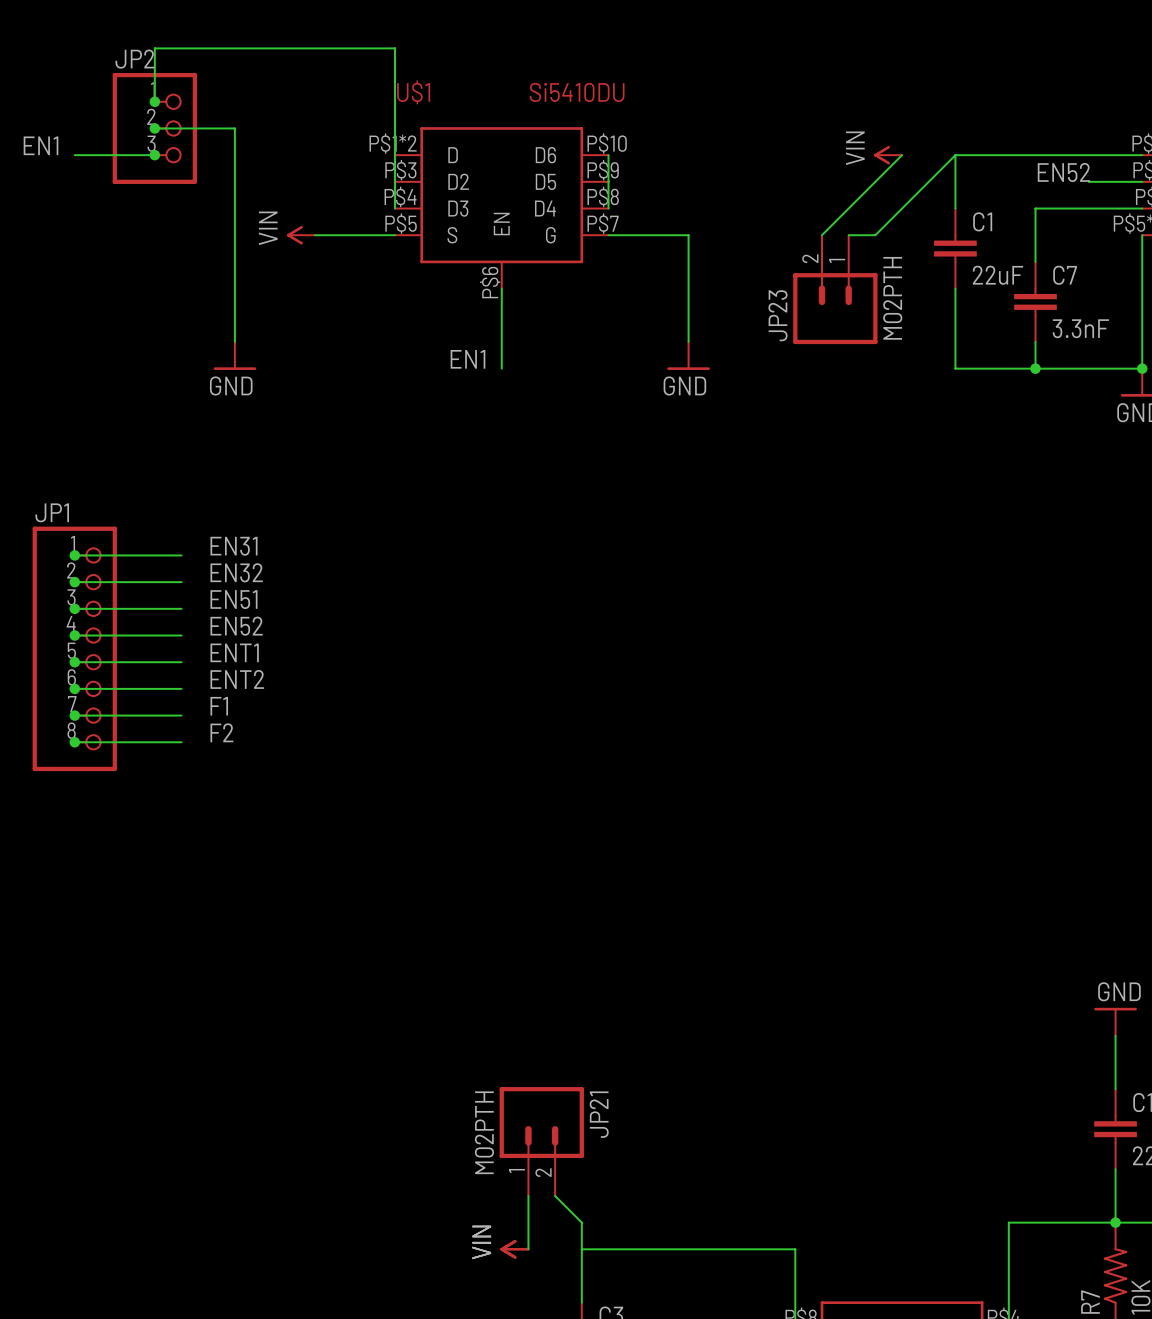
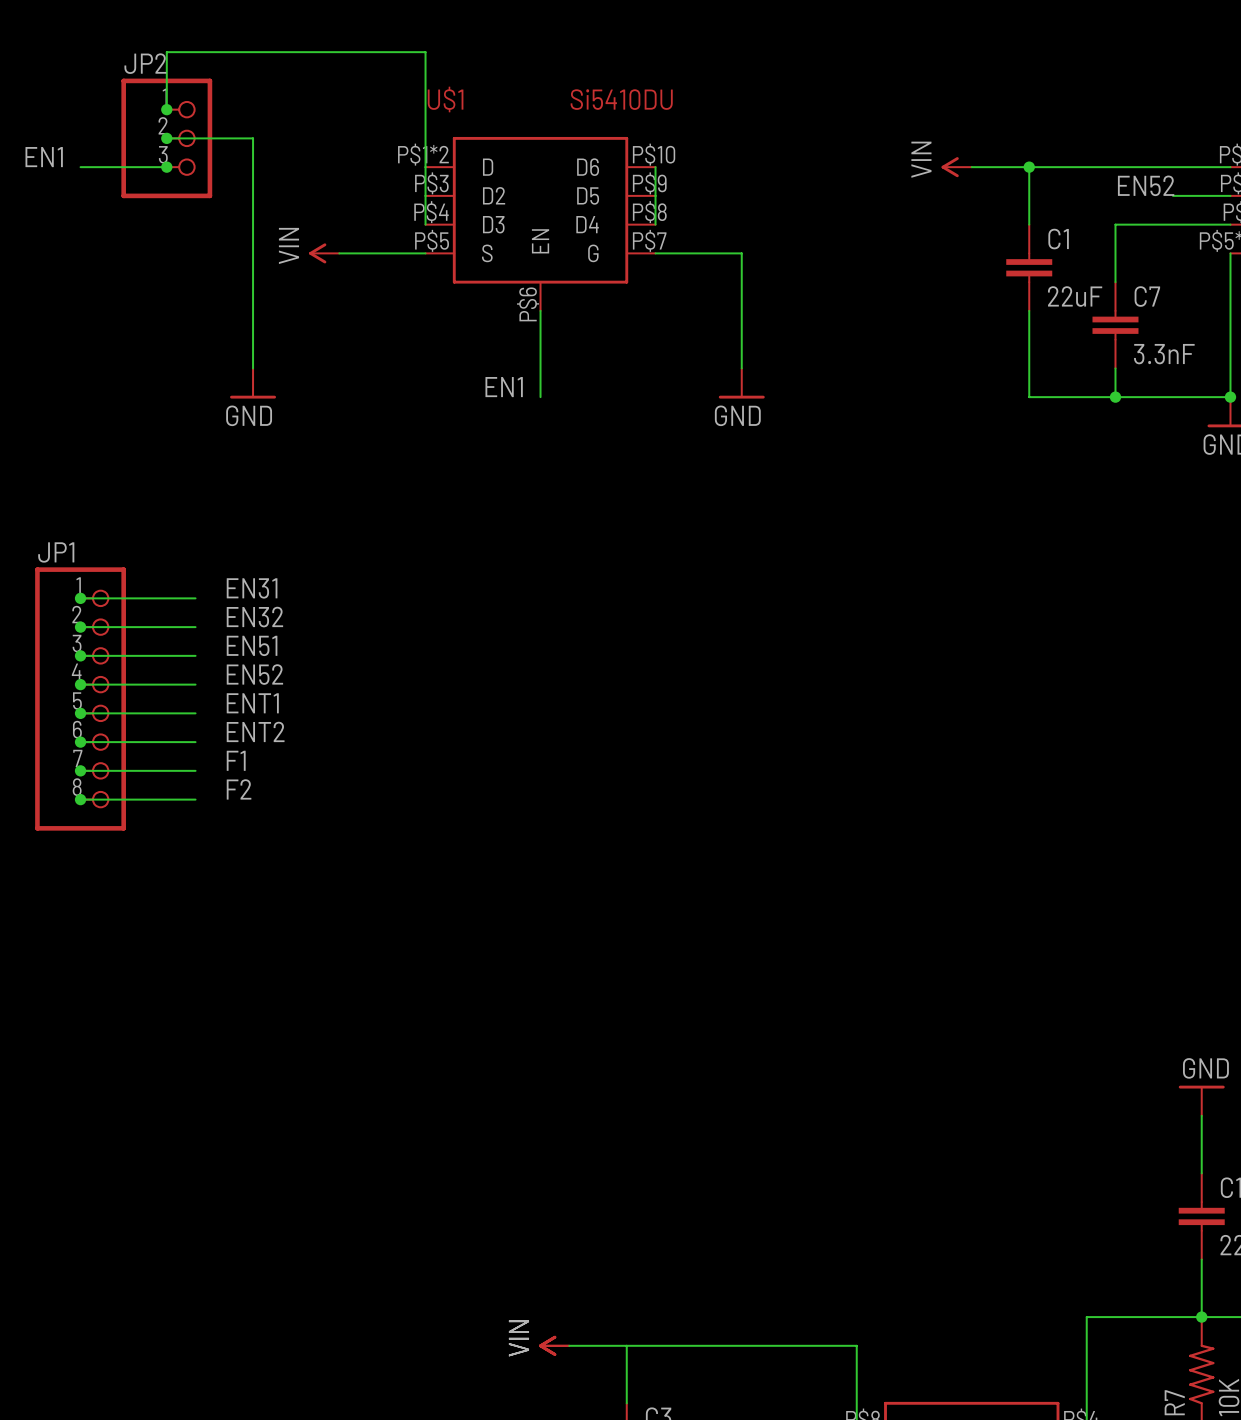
wire: (902, 155) (822, 235) -> none
wire: (955, 155) (875, 235) (848, 235) -> (1029, 167) (971, 167)
junction: none -> (1029, 167)
JP23: M02PTH (835, 289) -> none
JP21: M02PTH (541, 1141) -> none
wire: (528, 1195) (528, 1249) -> none
wire: (555, 1195) (581, 1222) (581, 1249) -> (569, 1345) (626, 1345)

